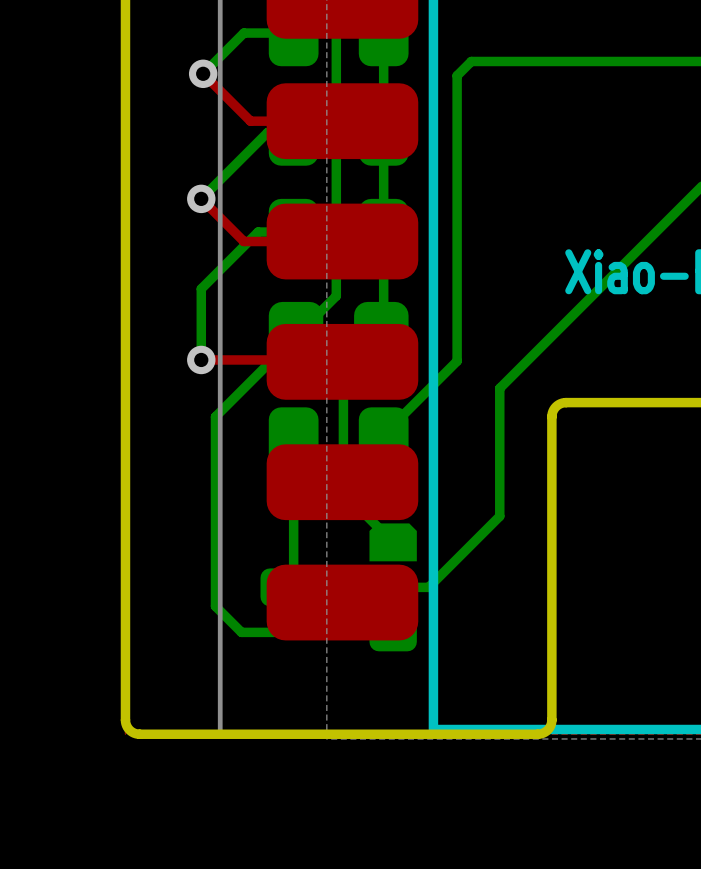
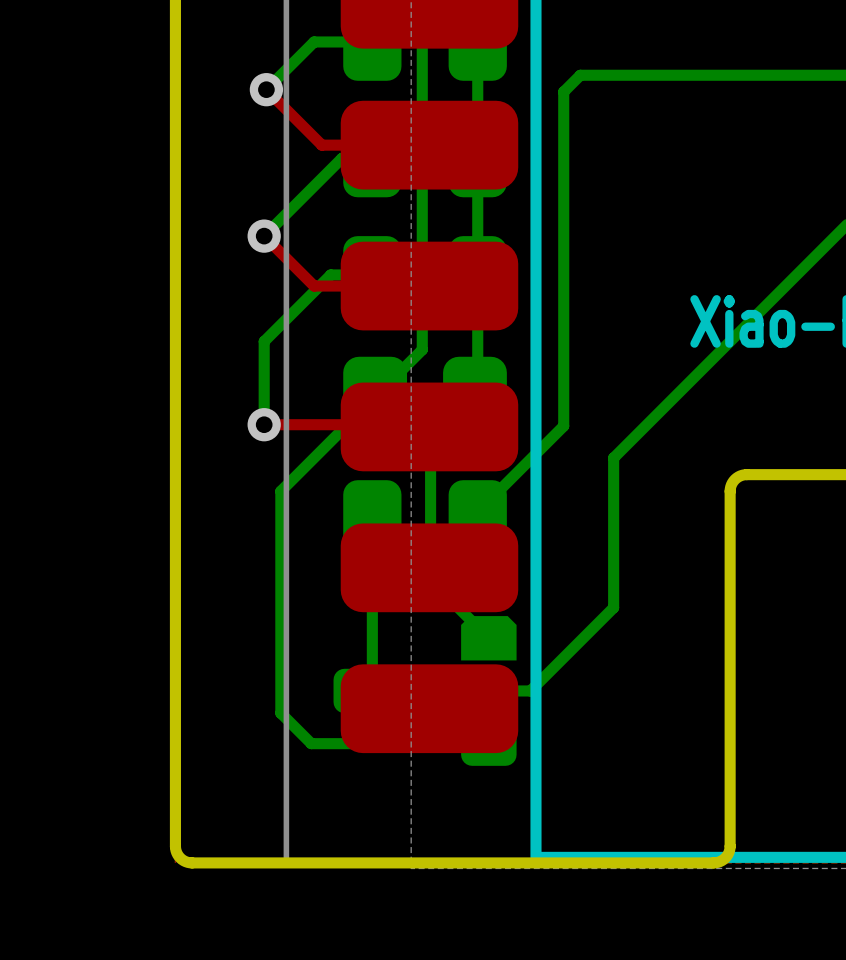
board edge: (613, 402) (564, 402) (557, 405) (552, 413) (551, 720) (547, 730) (537, 734) -> (746, 474) (735, 479) (730, 491) (729, 850) (723, 859) (715, 862) (658, 862)

